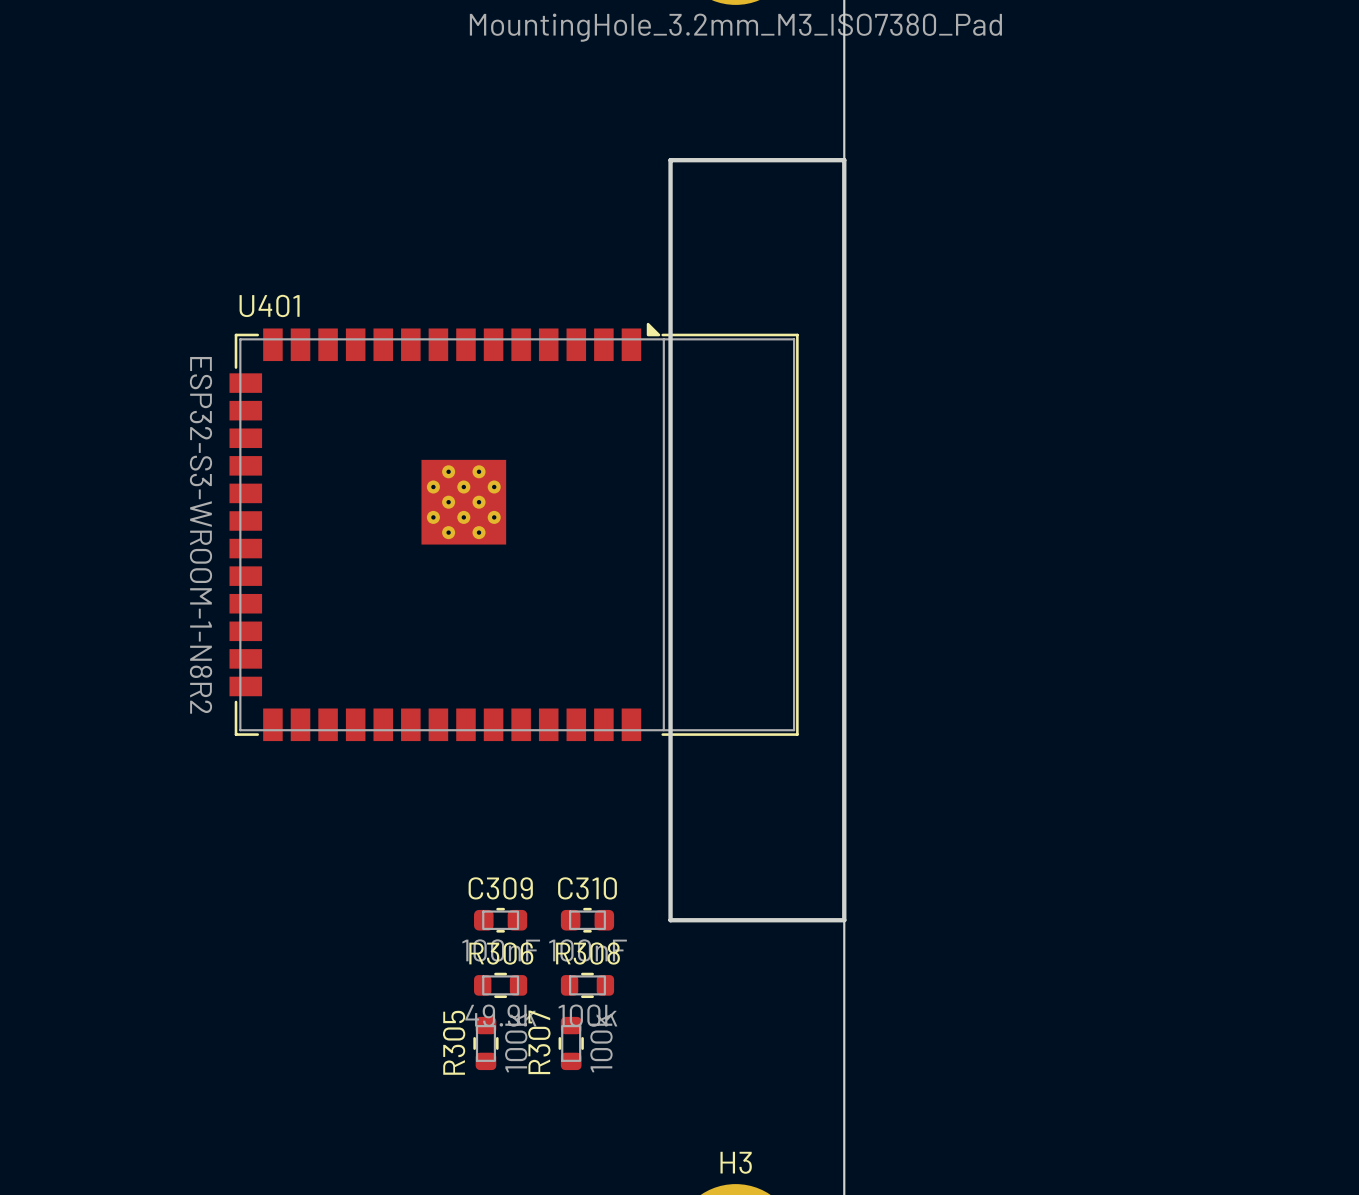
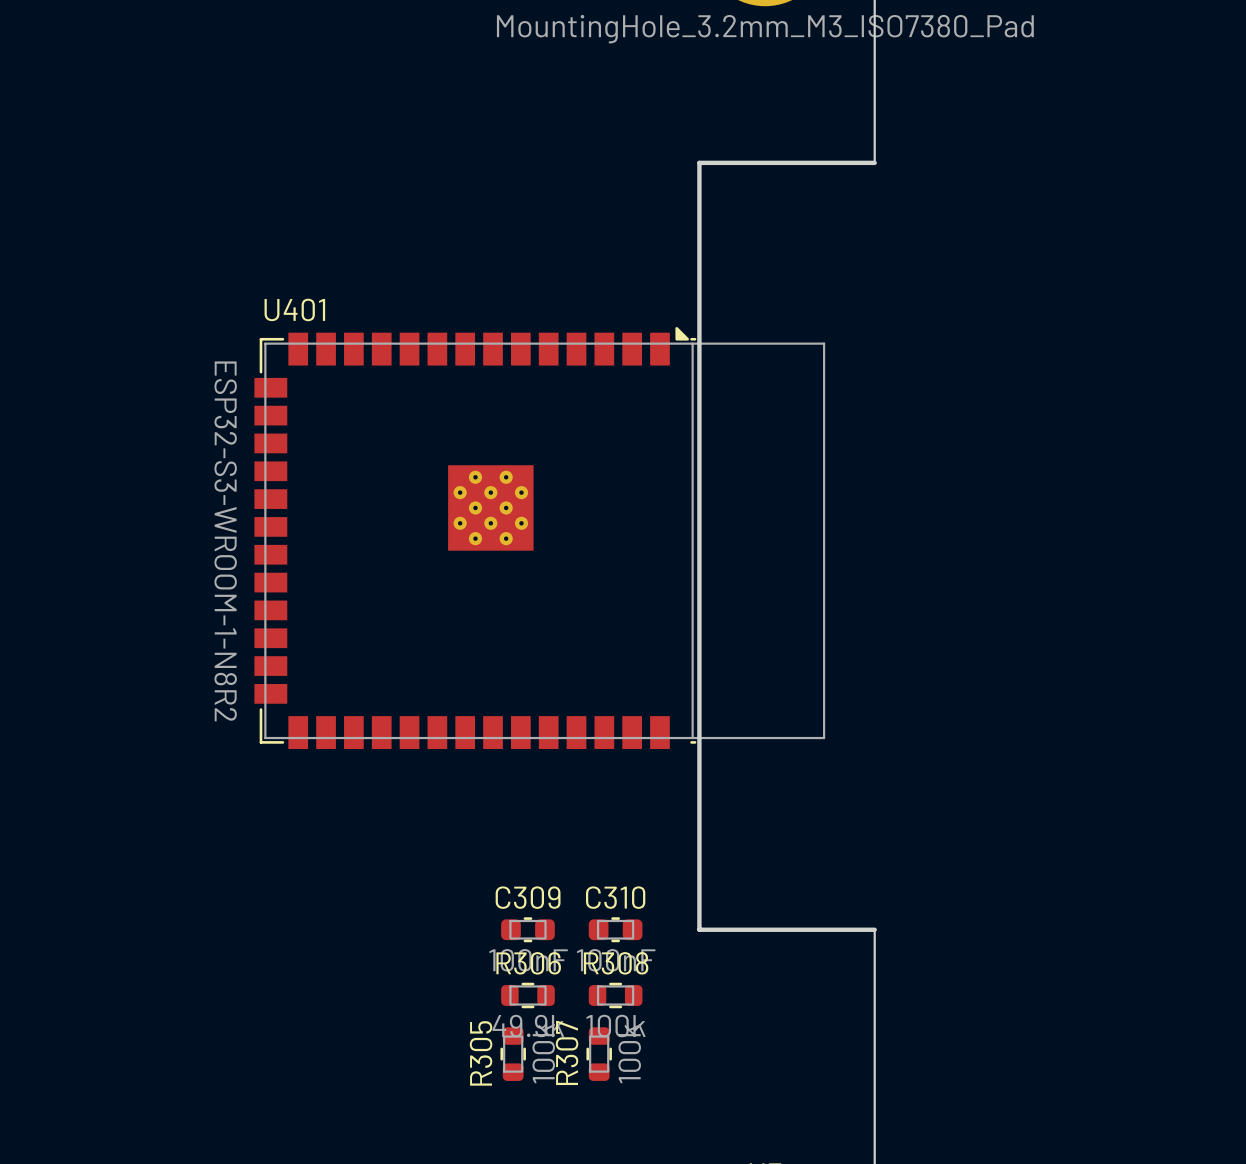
board edge: (844, 160) (844, 920) (844, 160) -> none
U401 footprint: [229, 322, 799, 742] -> [254, 326, 826, 749]

